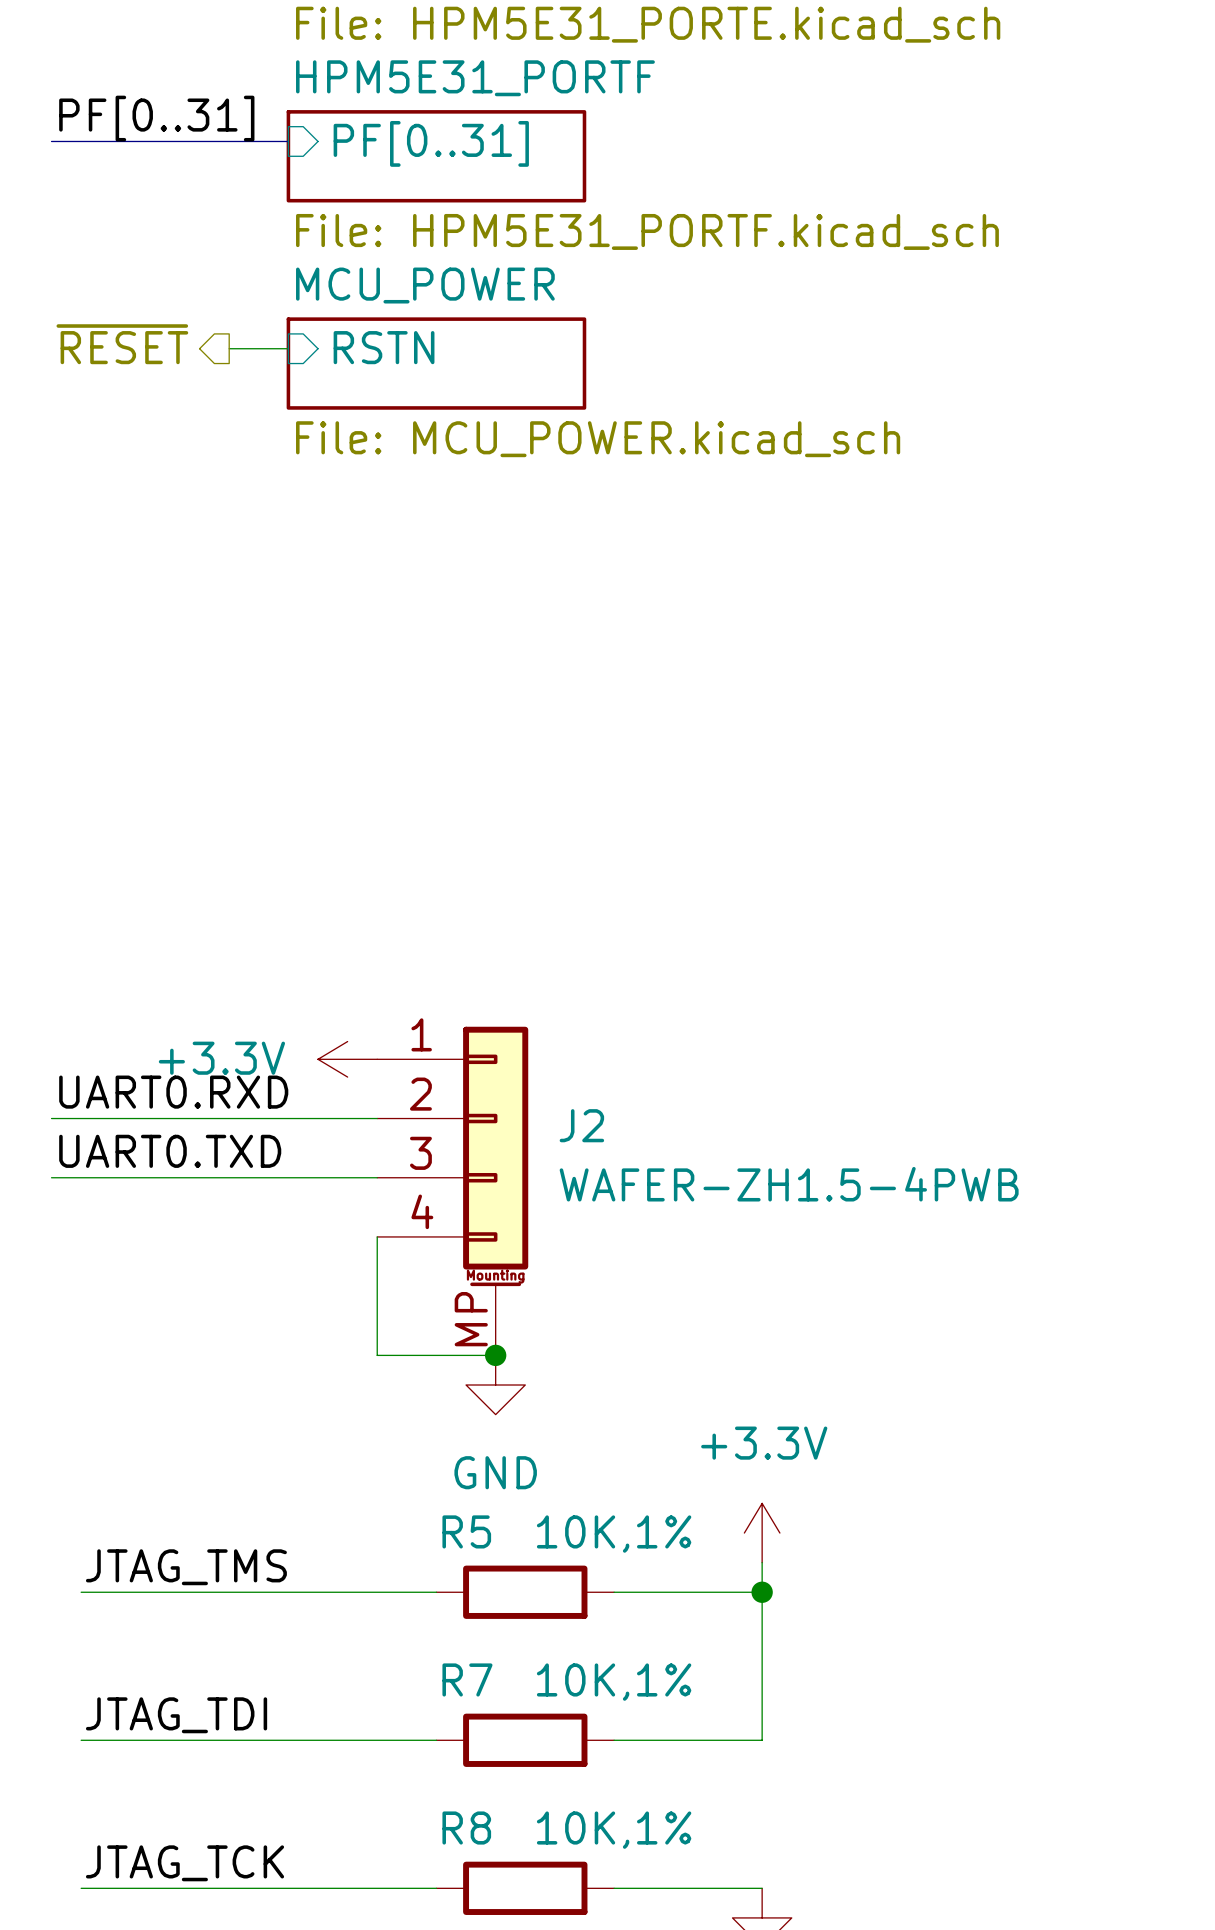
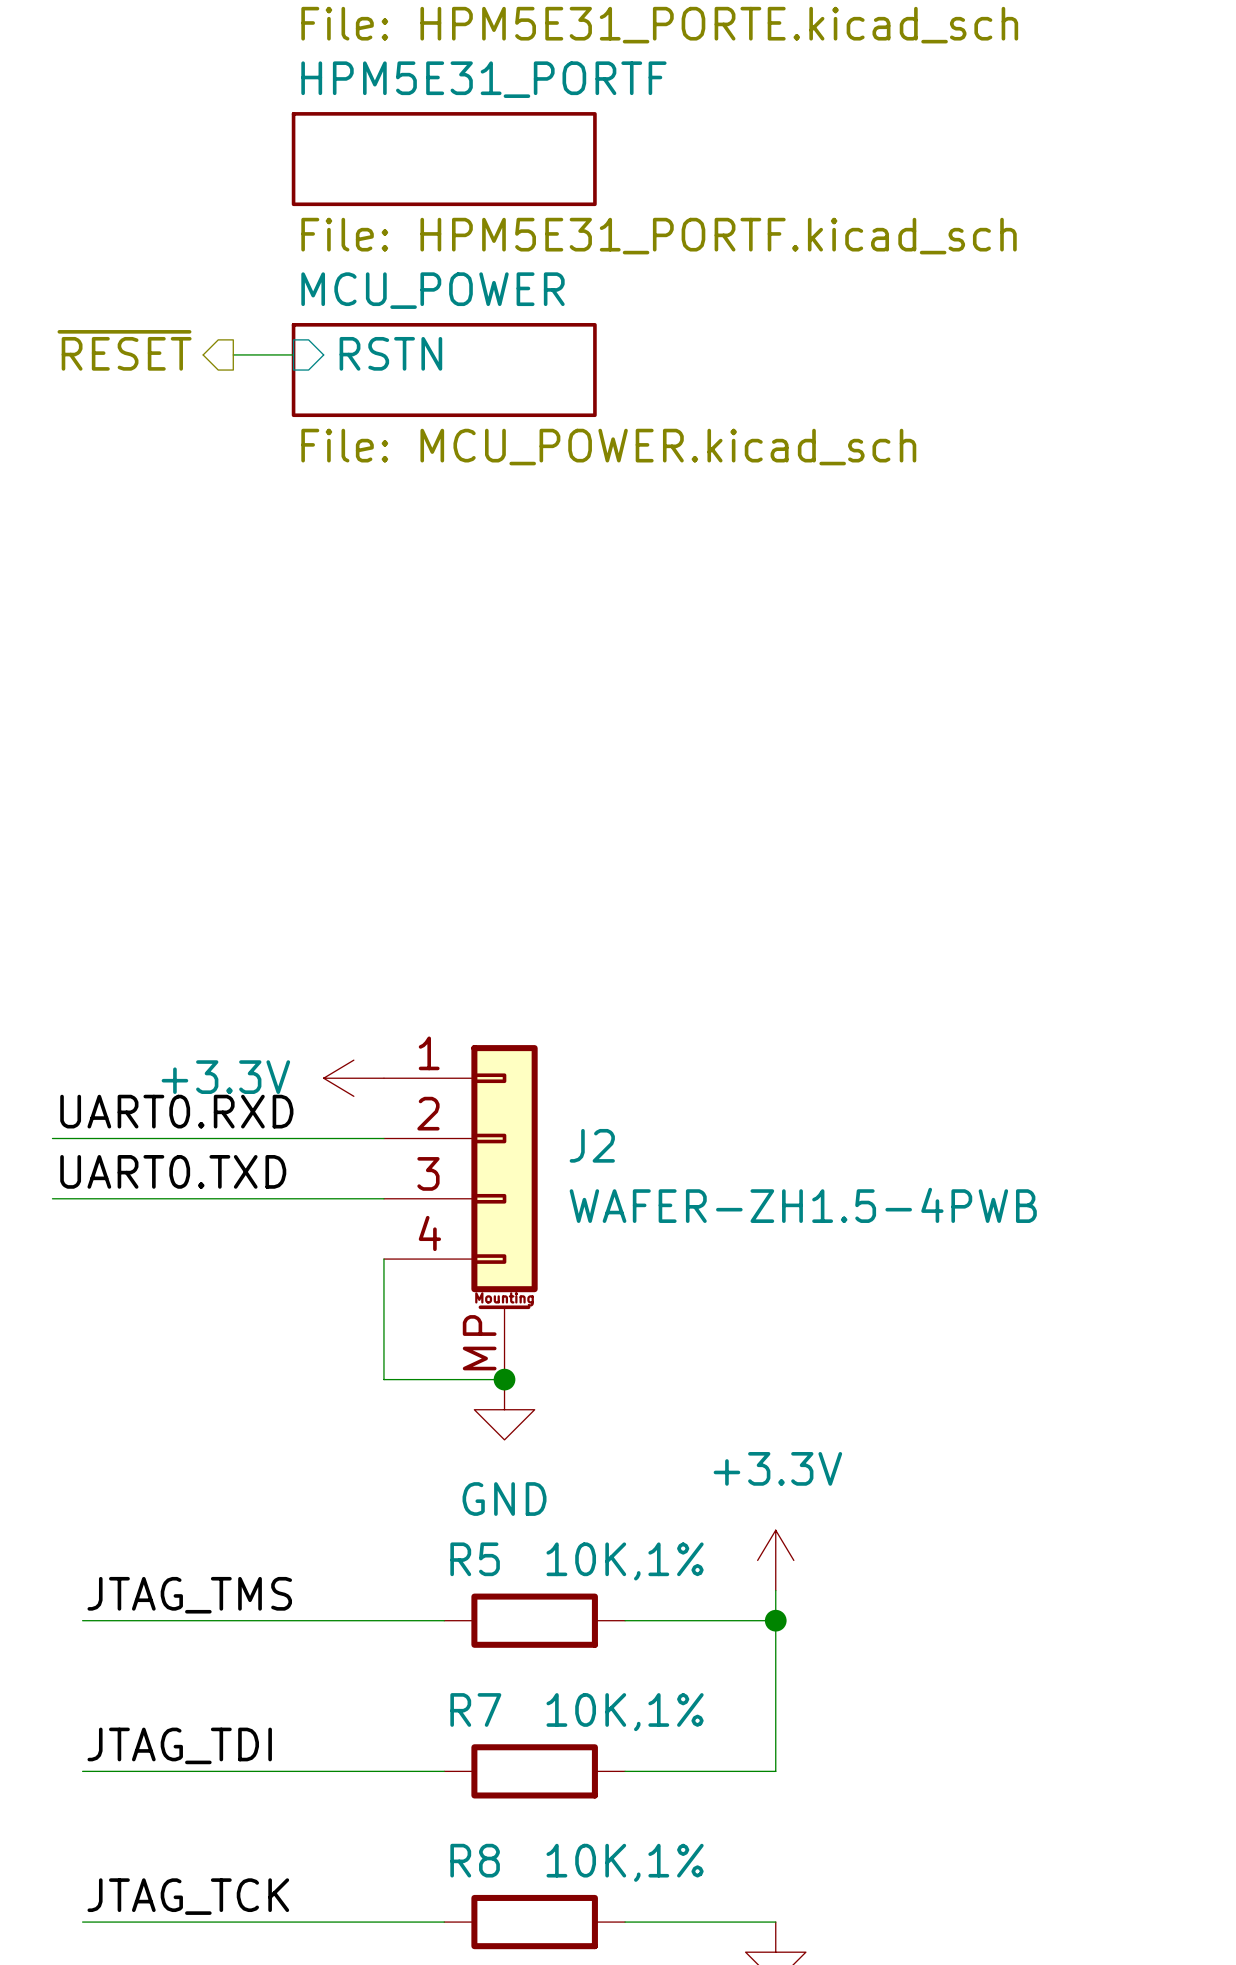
label: PF[0..31] (156, 118) -> none
bus: (51, 141) (288, 141) -> none
sheet pin: PF[0..31] (431, 143) -> none

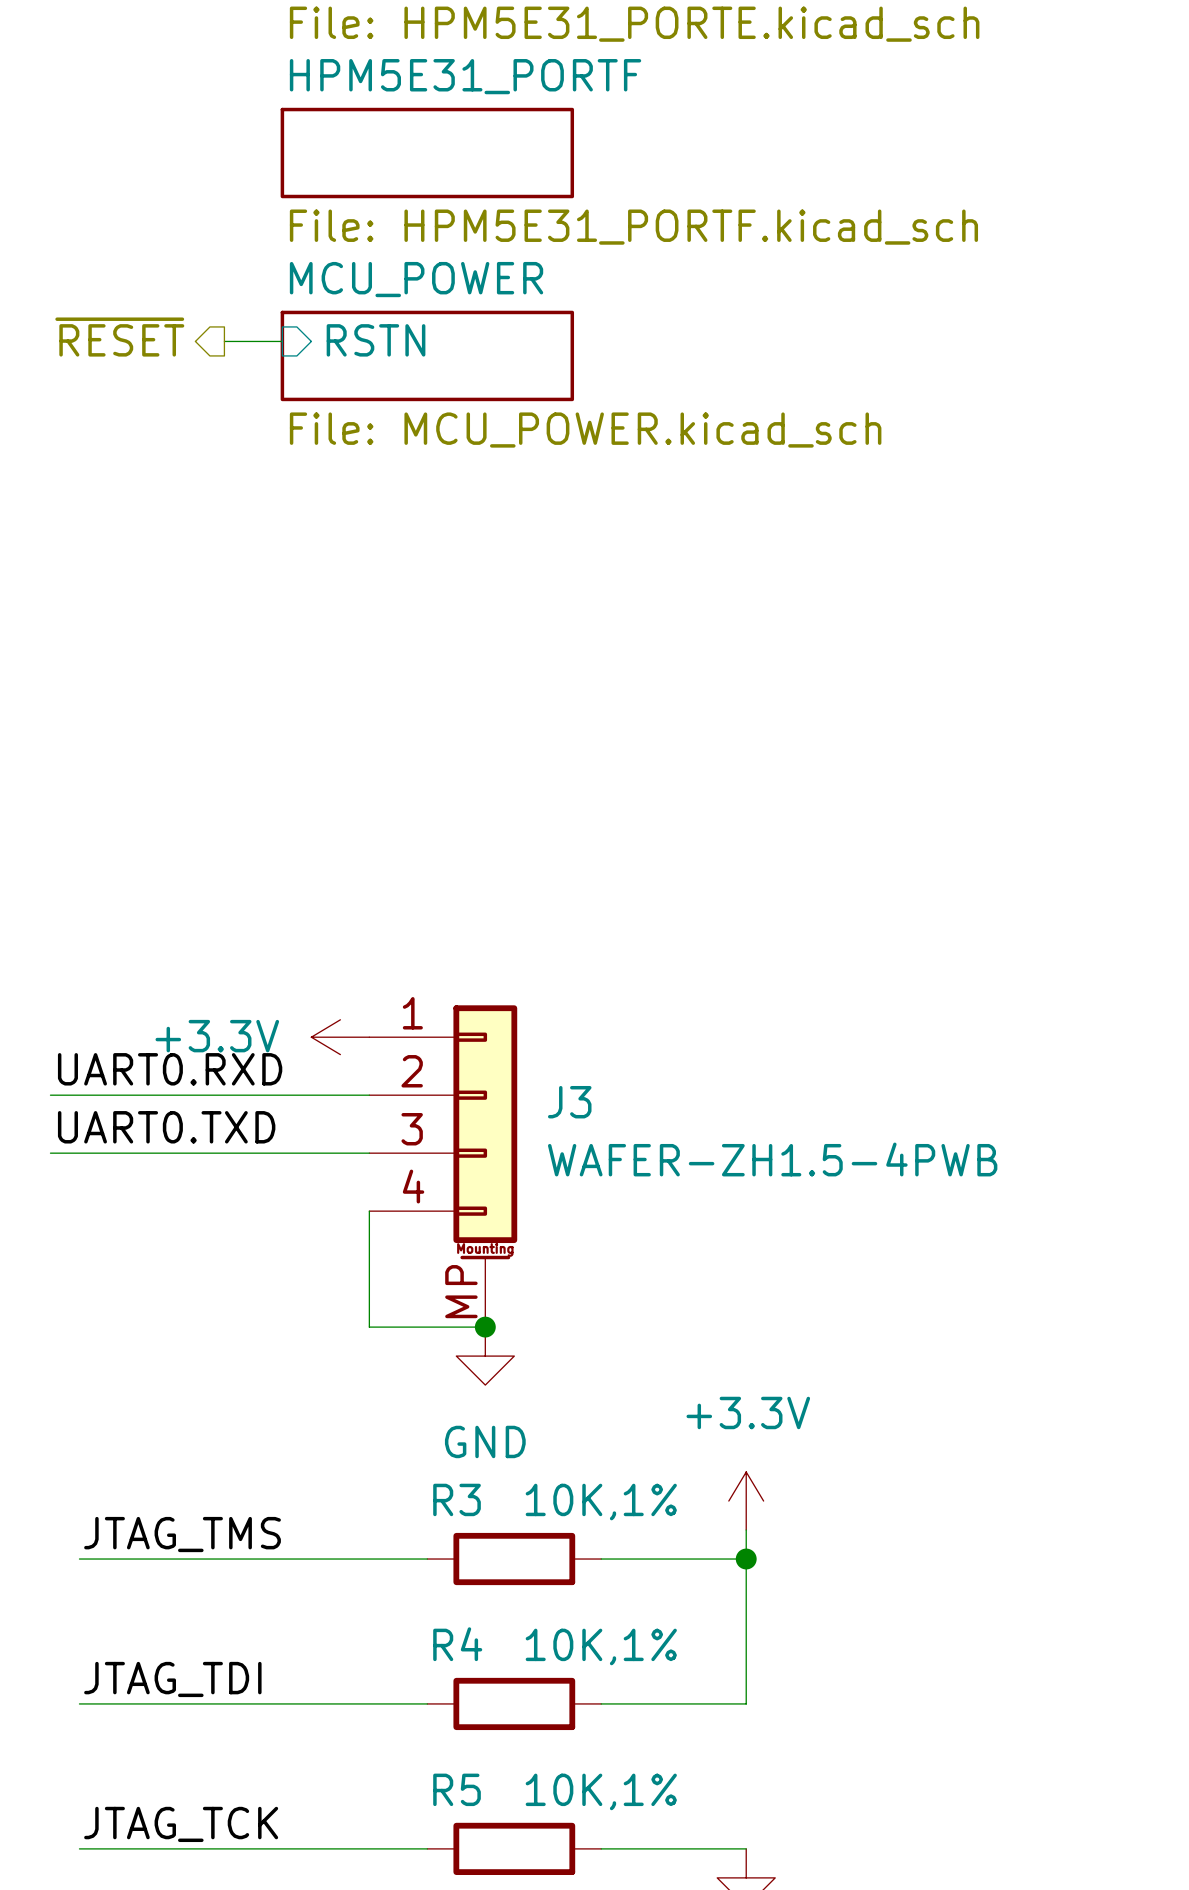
J2 name: J2 (592, 1145) -> J3 (569, 1102)
R5 name: R5 (475, 1559) -> R3 (457, 1499)
R7 name: R7 (475, 1709) -> R4 (457, 1644)
R8 name: R8 (475, 1860) -> R5 (457, 1789)

